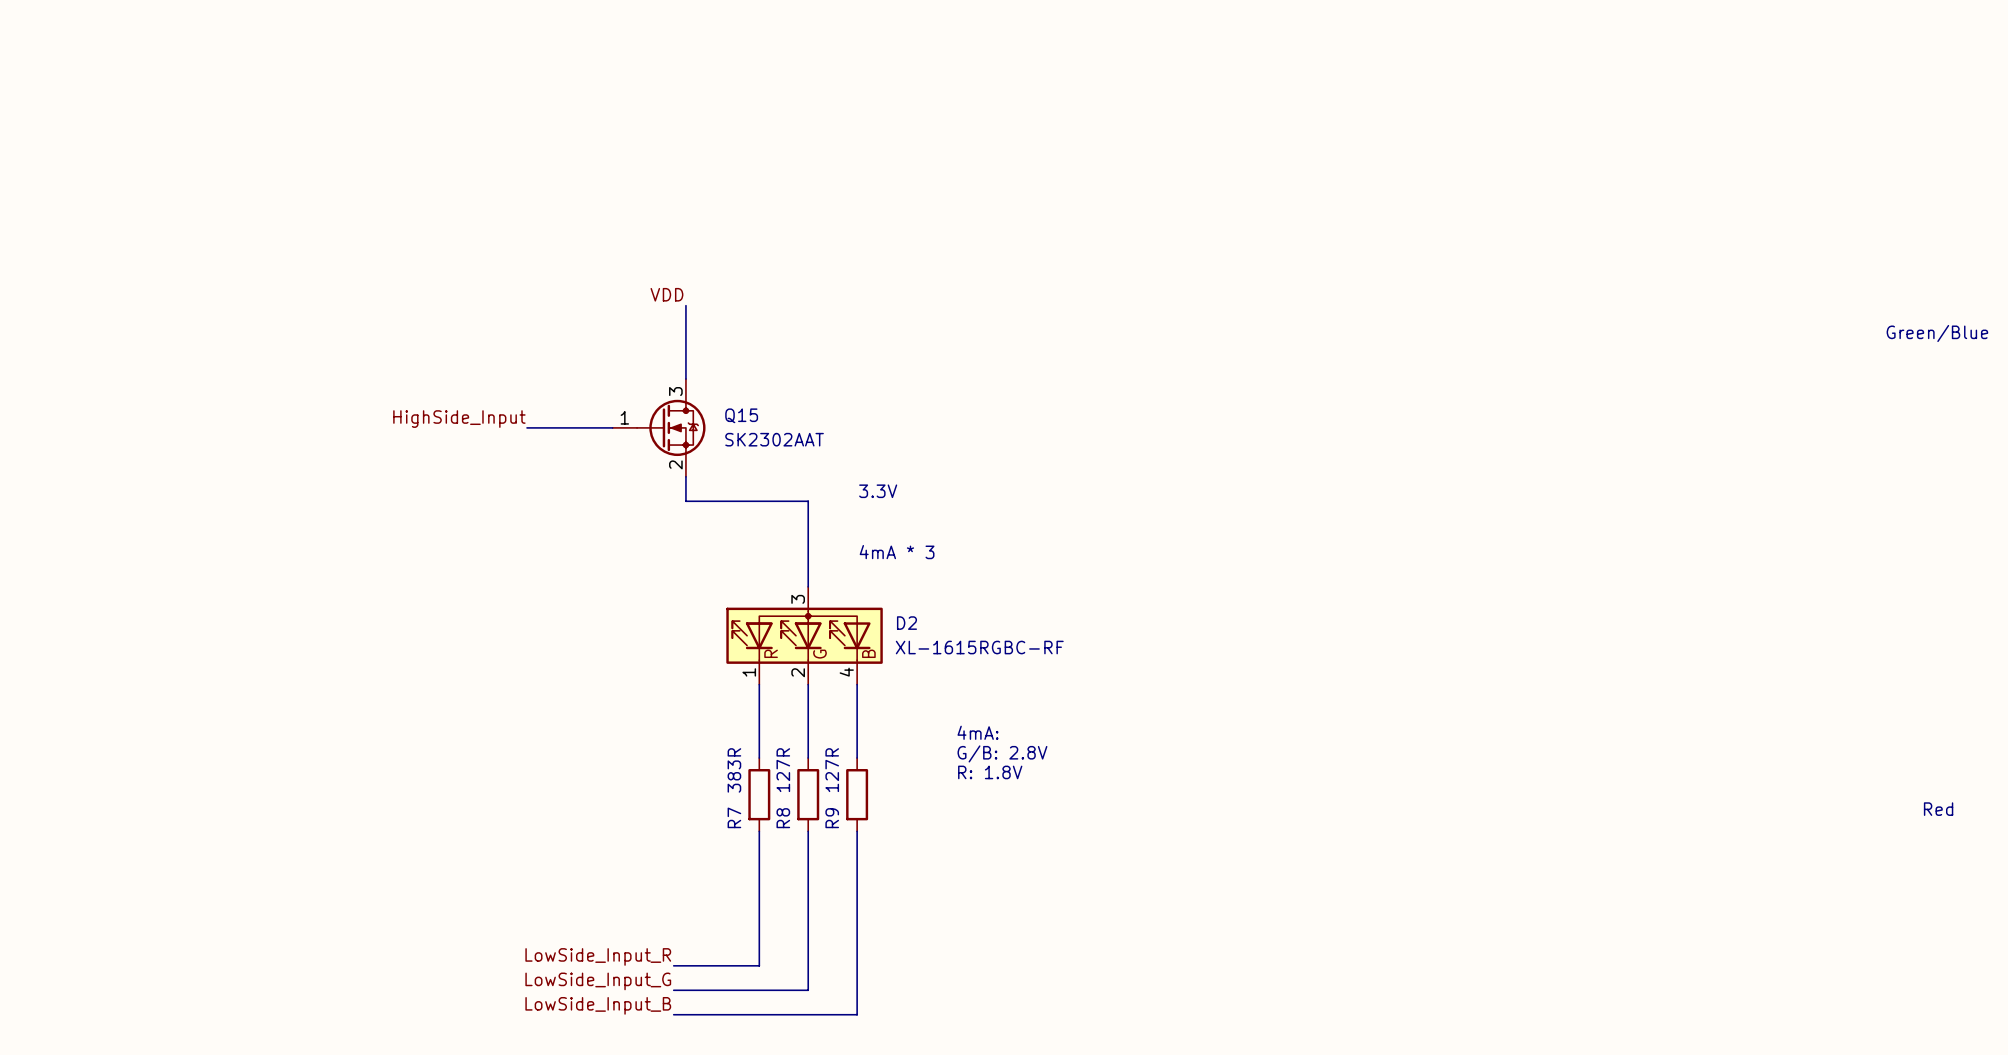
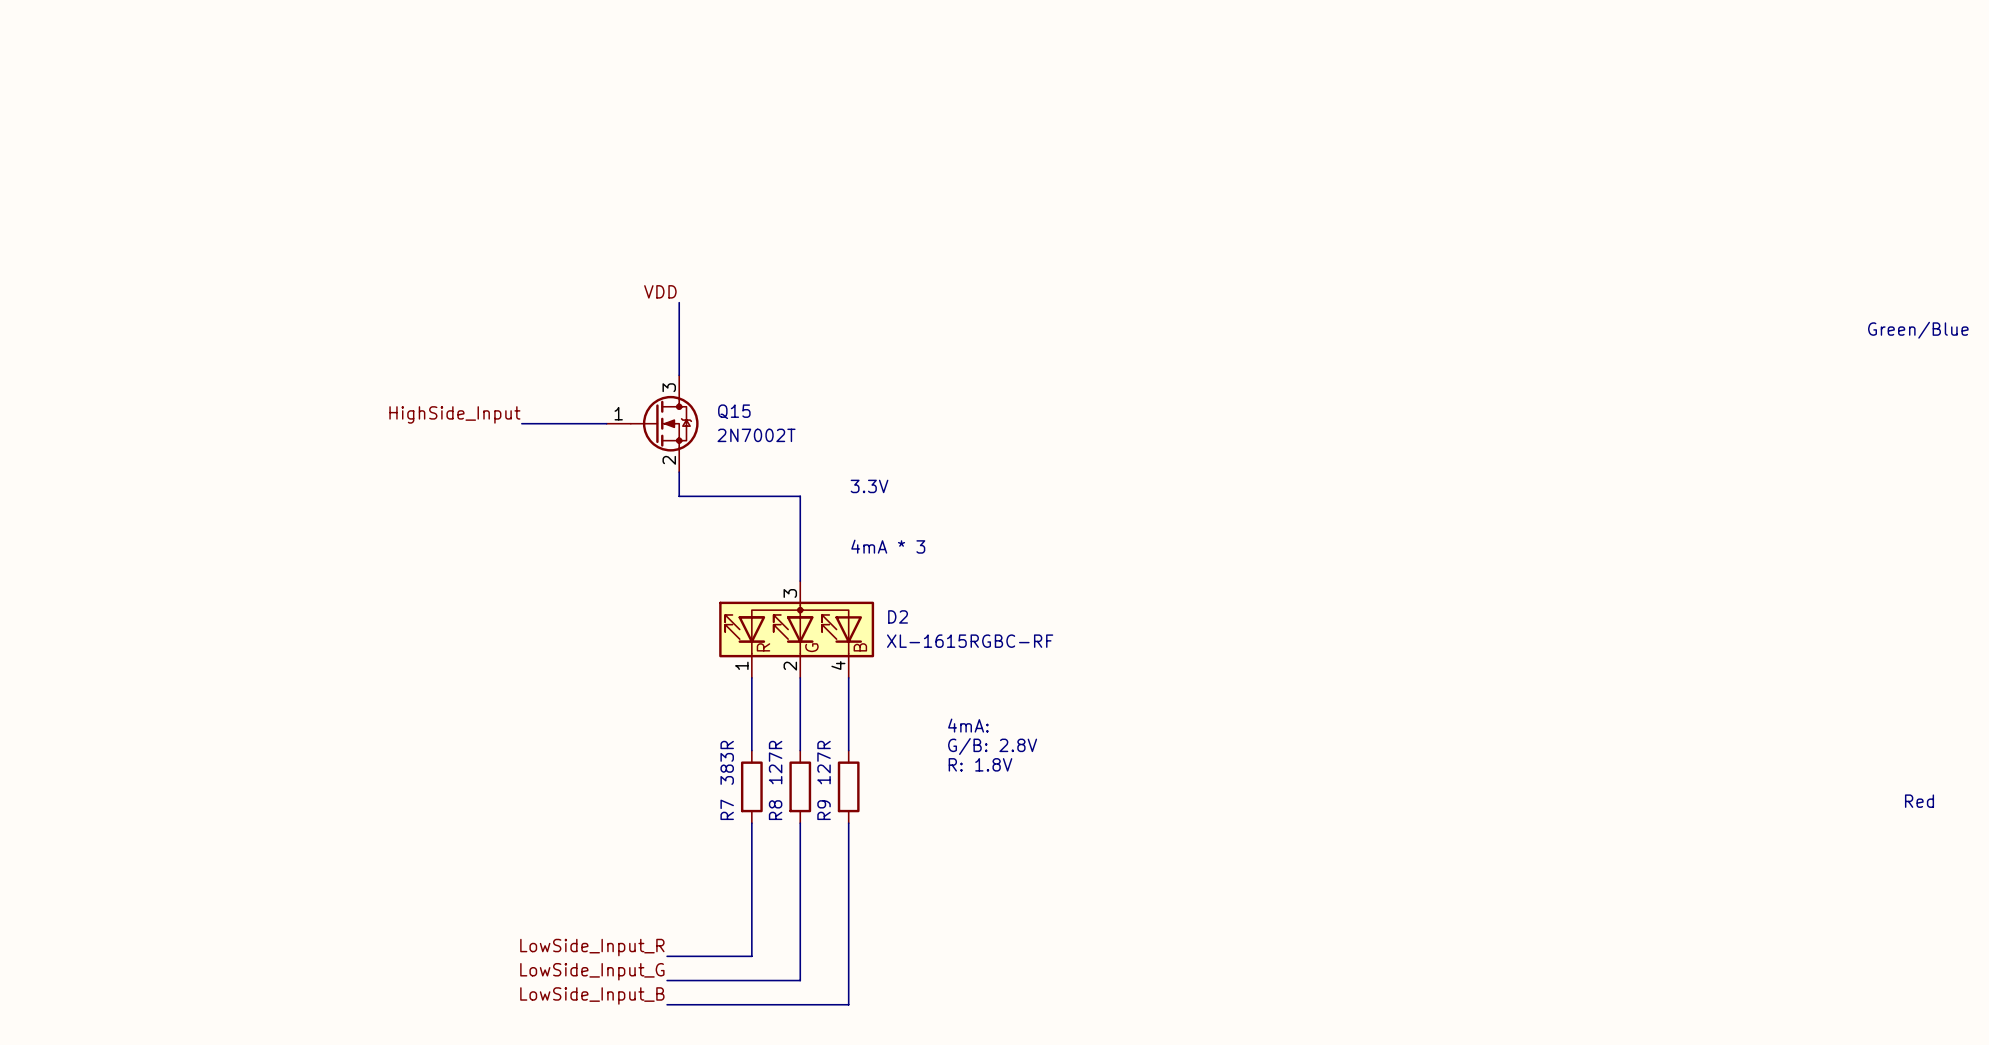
Q15 value: SK2302AAT (774, 439) -> 2N7002T (756, 435)

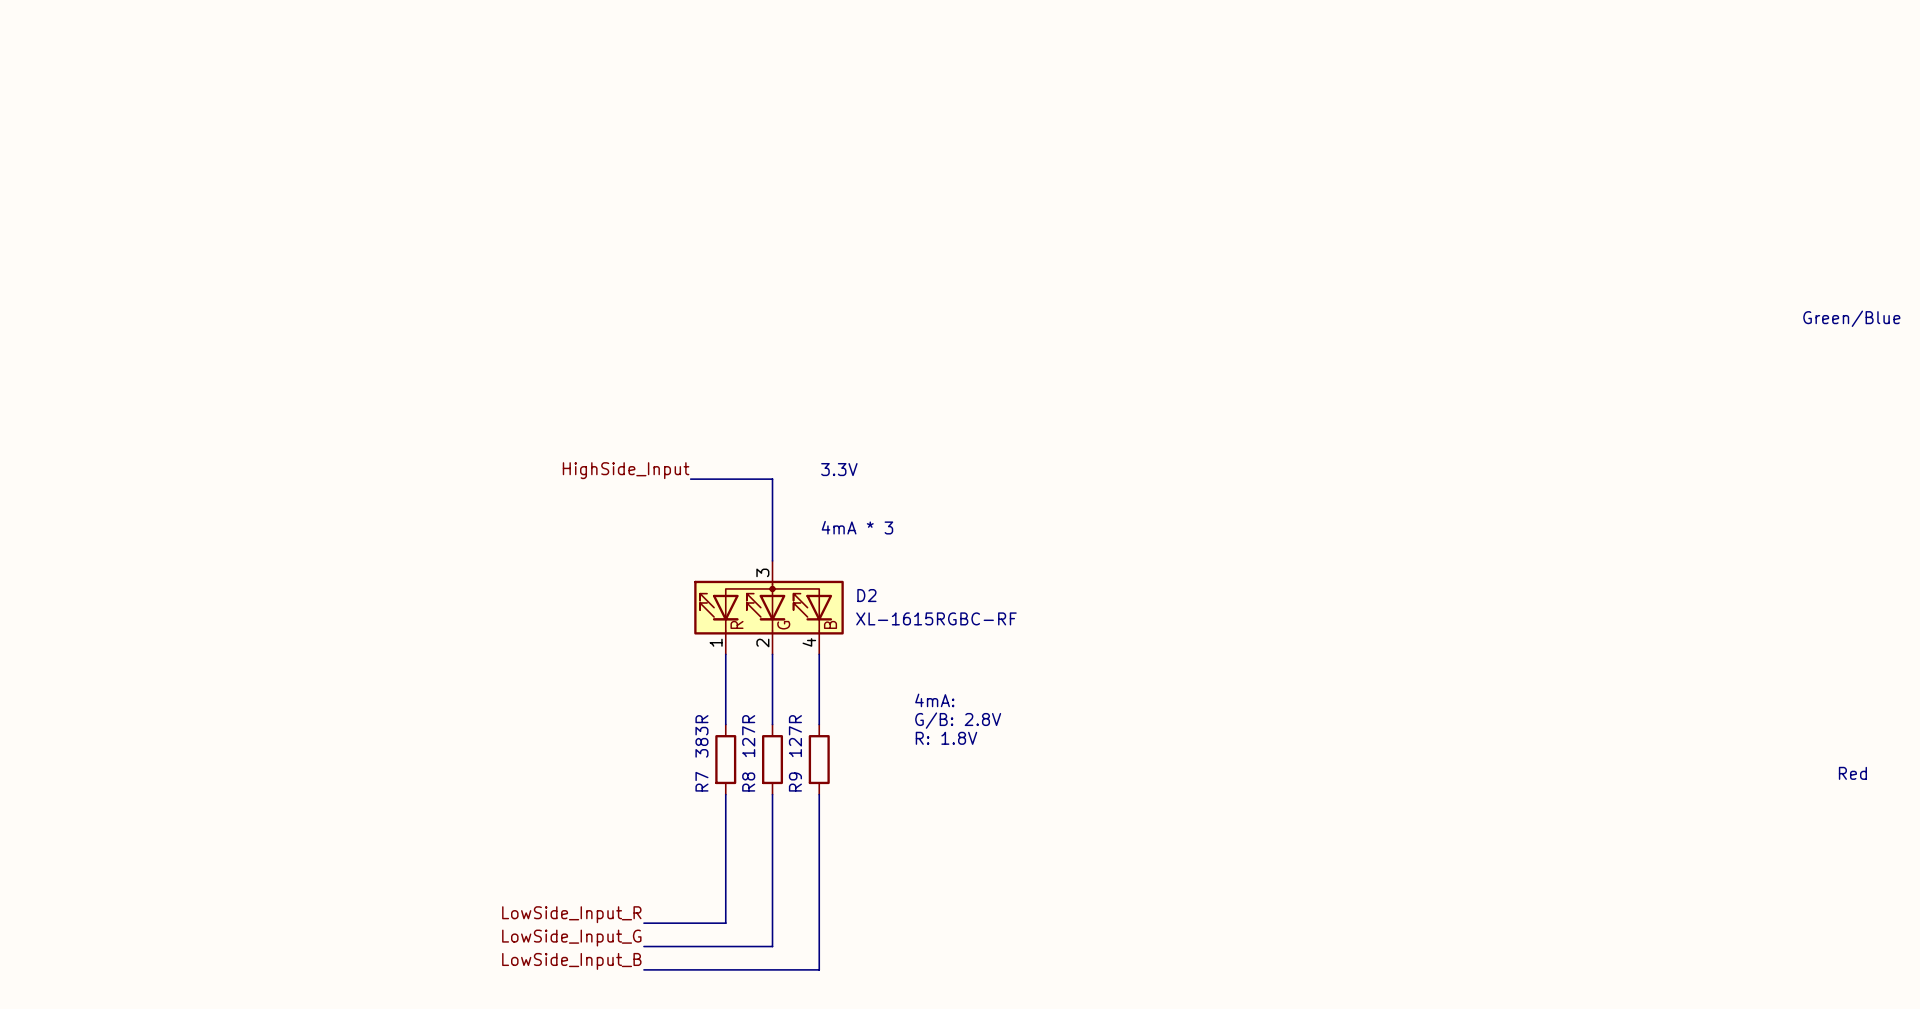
label: VDD (660, 291) -> none
wire: (679, 302) (679, 375) -> none
label position: HighSide_Input (454, 414) -> HighSide_Input (626, 470)
wire: (521, 423) (606, 423) -> none
Q15: 2N7002T (652, 423) -> none
wire: (679, 472) (679, 496) (715, 496) -> none

